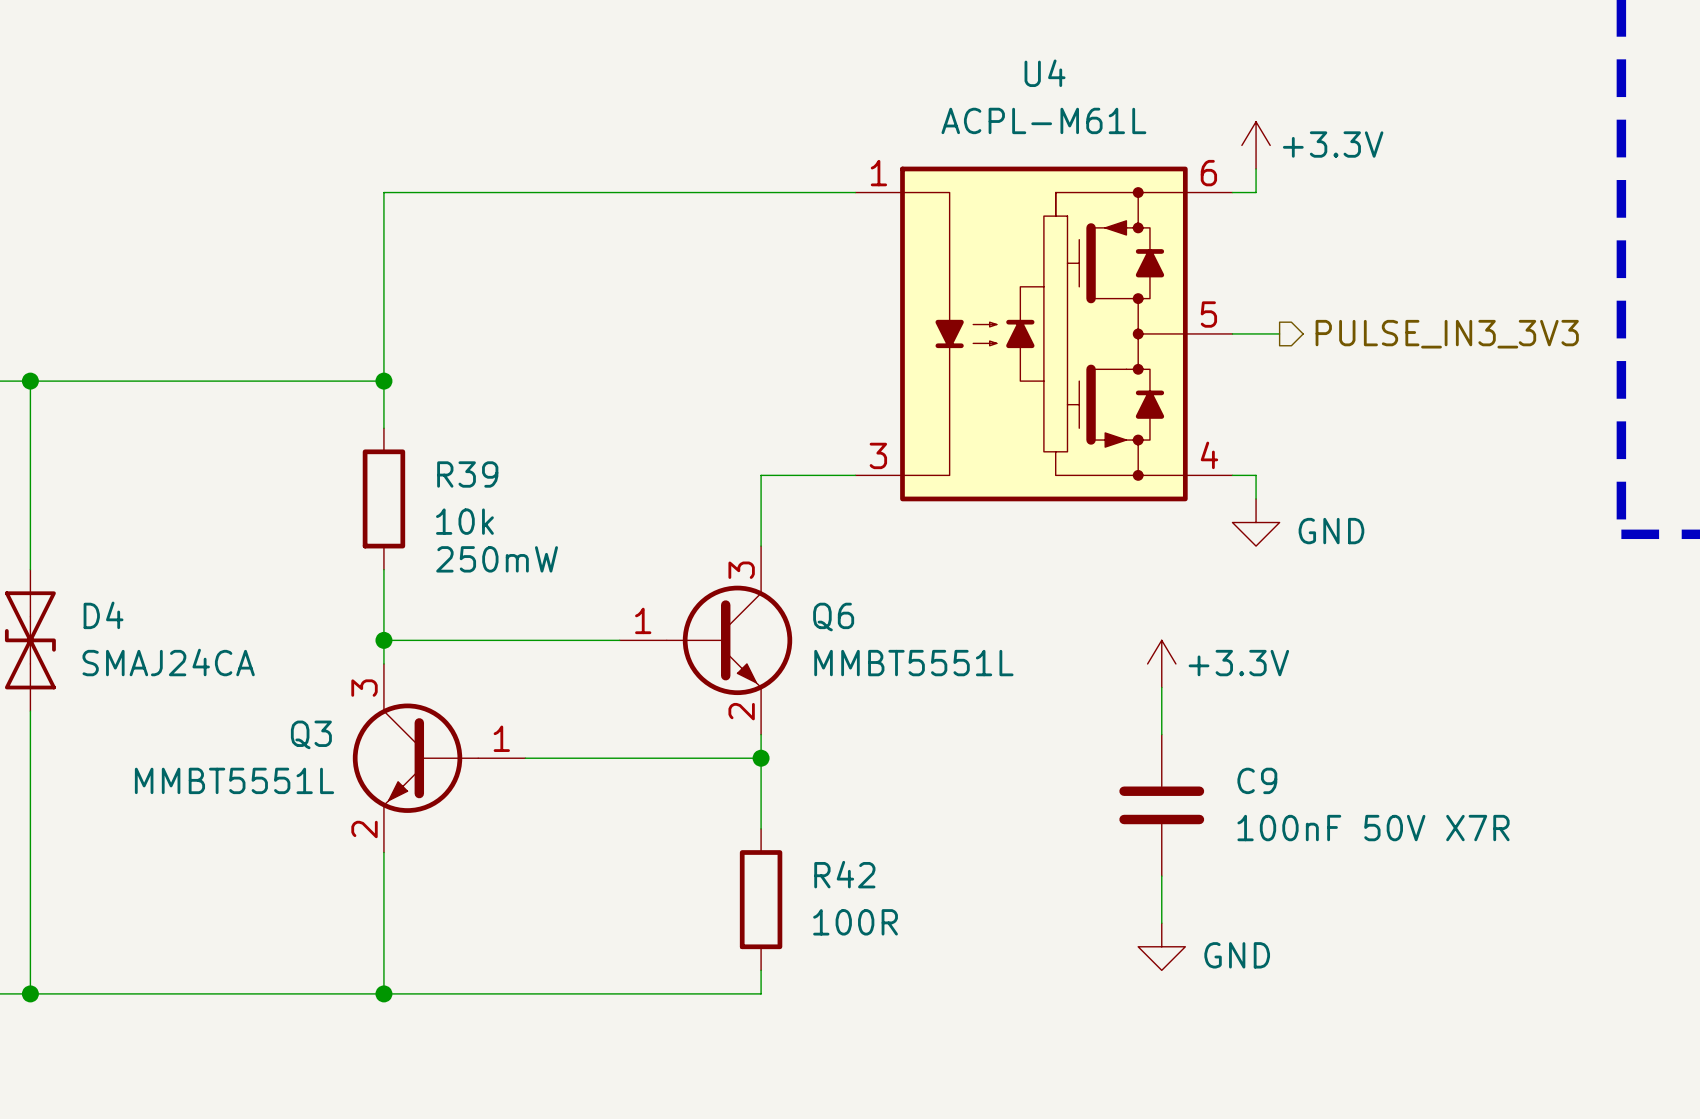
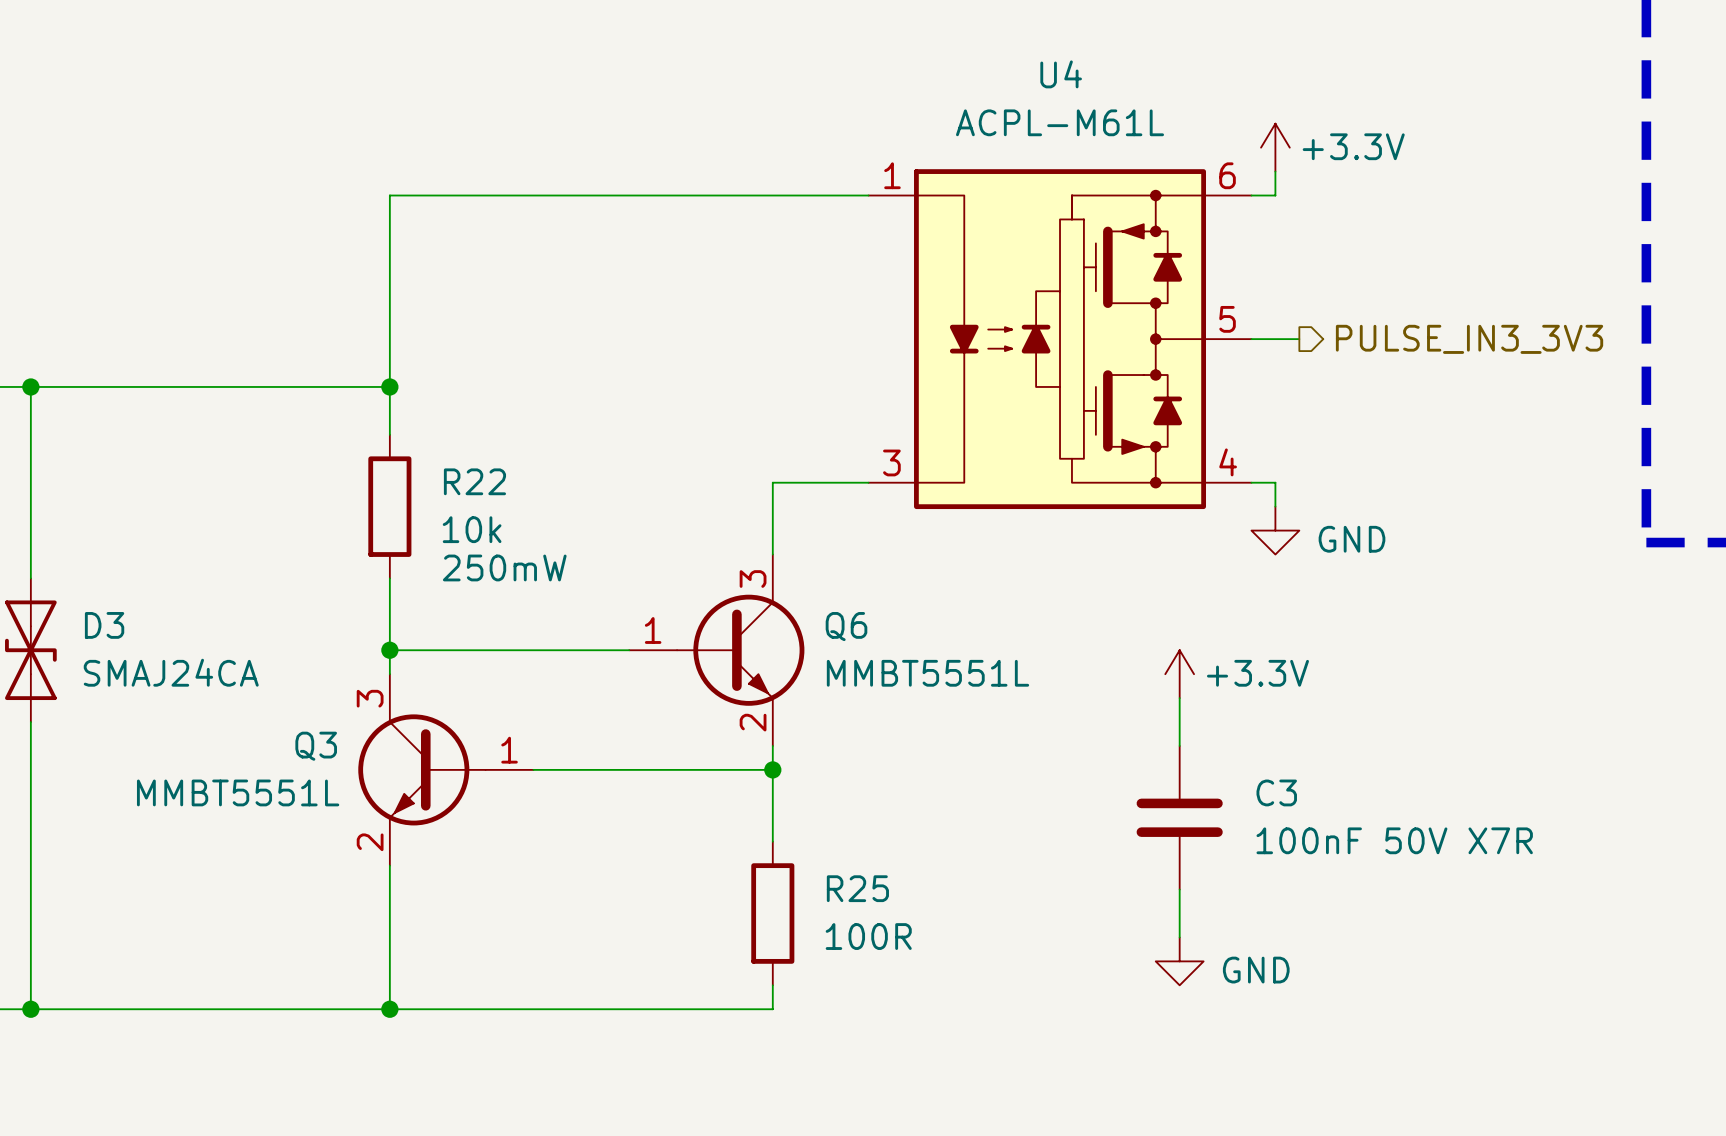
R39 name: R39 (467, 474) -> R22 (474, 481)
D4 name: D4 (103, 615) -> D3 (104, 625)
C9 name: C9 (1257, 780) -> C3 (1276, 792)
R42 name: R42 (844, 874) -> R25 (857, 888)

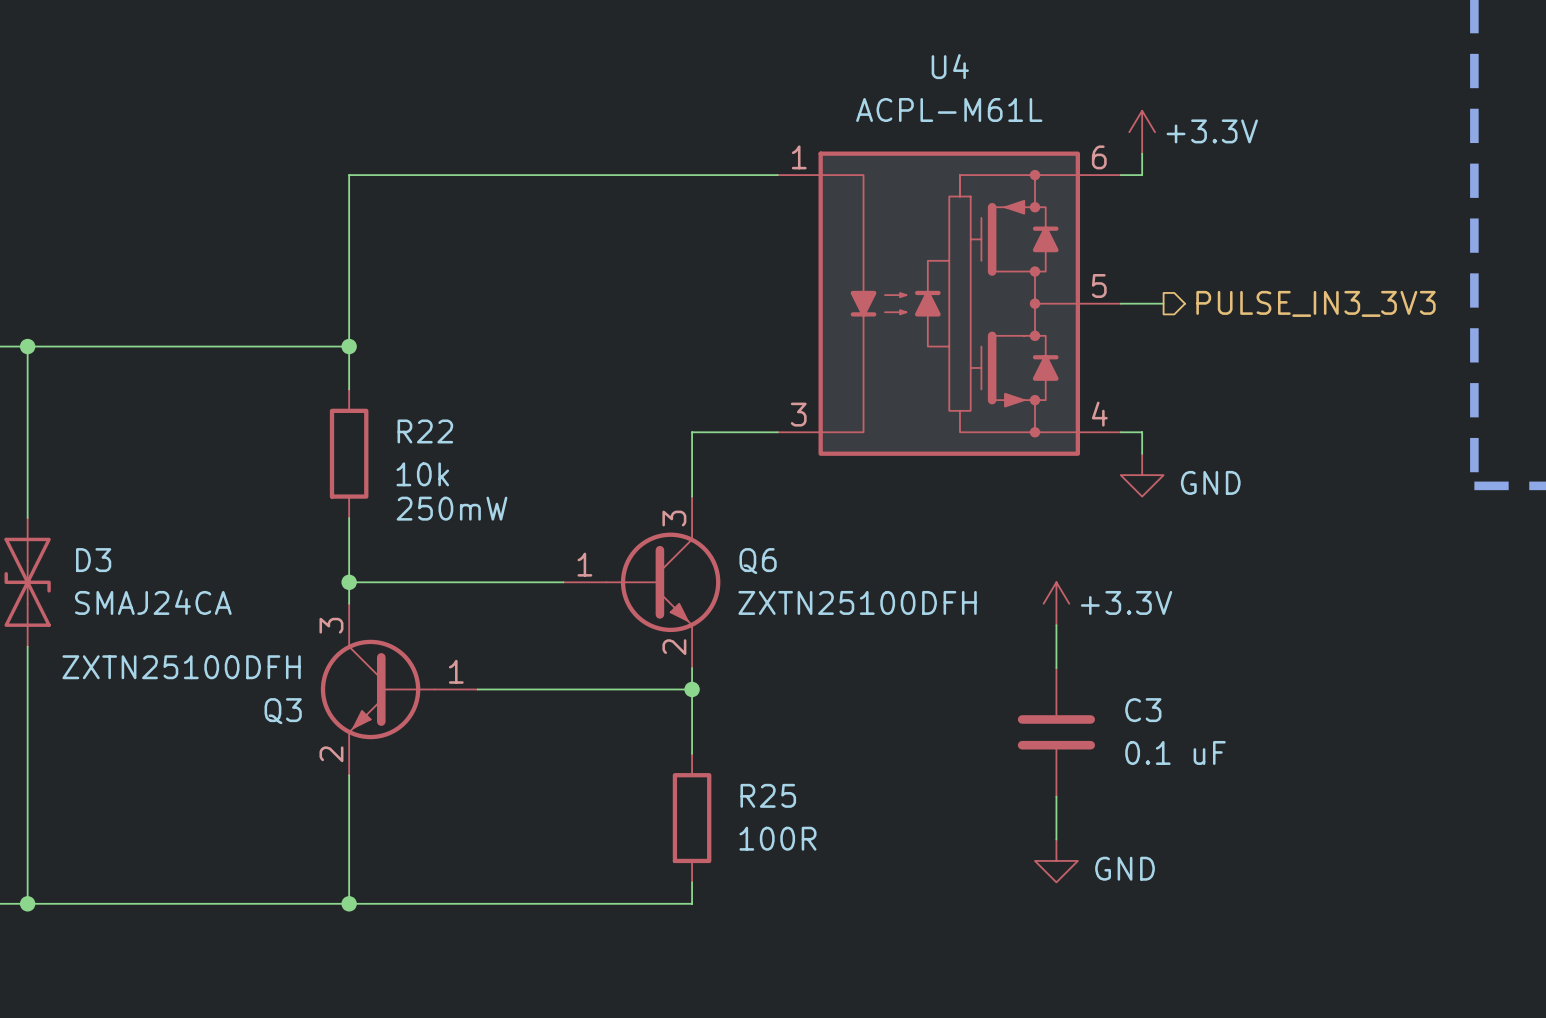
Q6 value: MMBT5551L (927, 673) -> ZXTN25100DFH (857, 602)
Q3 name position: Q3 (316, 746) -> Q3 (283, 711)
Q3 value: MMBT5551L (238, 792) -> ZXTN25100DFH (181, 667)
C3 value: 100nF 50V X7R (1394, 840) -> 0.1 uF (1175, 752)

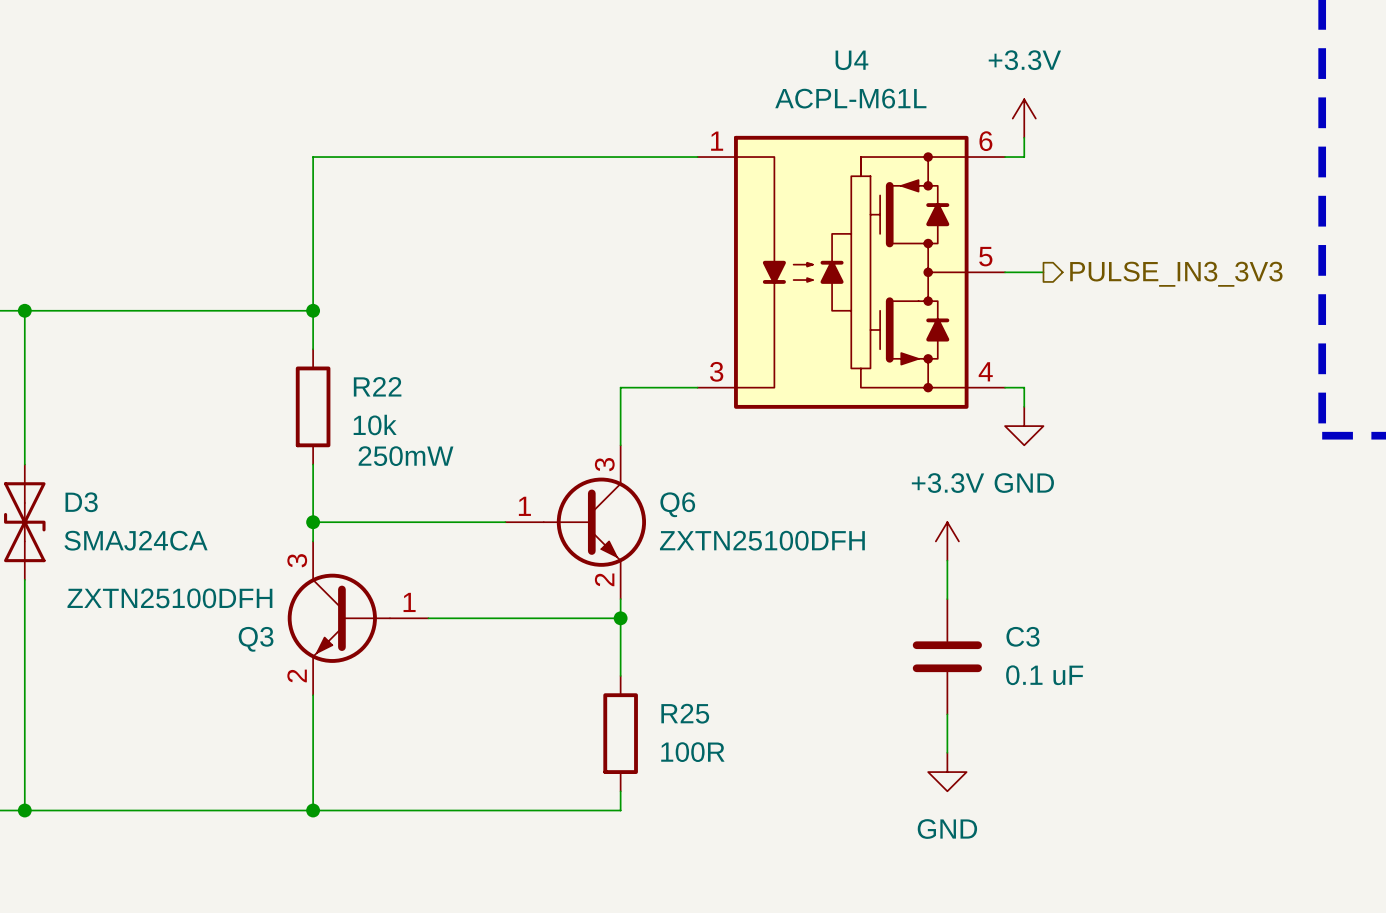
power symbol text position: +3.3V (1212, 131) -> +3.3V (1024, 60)
power symbol text position: GND (1210, 482) -> GND (1024, 483)
power symbol text position: +3.3V (1126, 602) -> +3.3V (948, 483)
power symbol text position: GND (1125, 868) -> GND (947, 829)

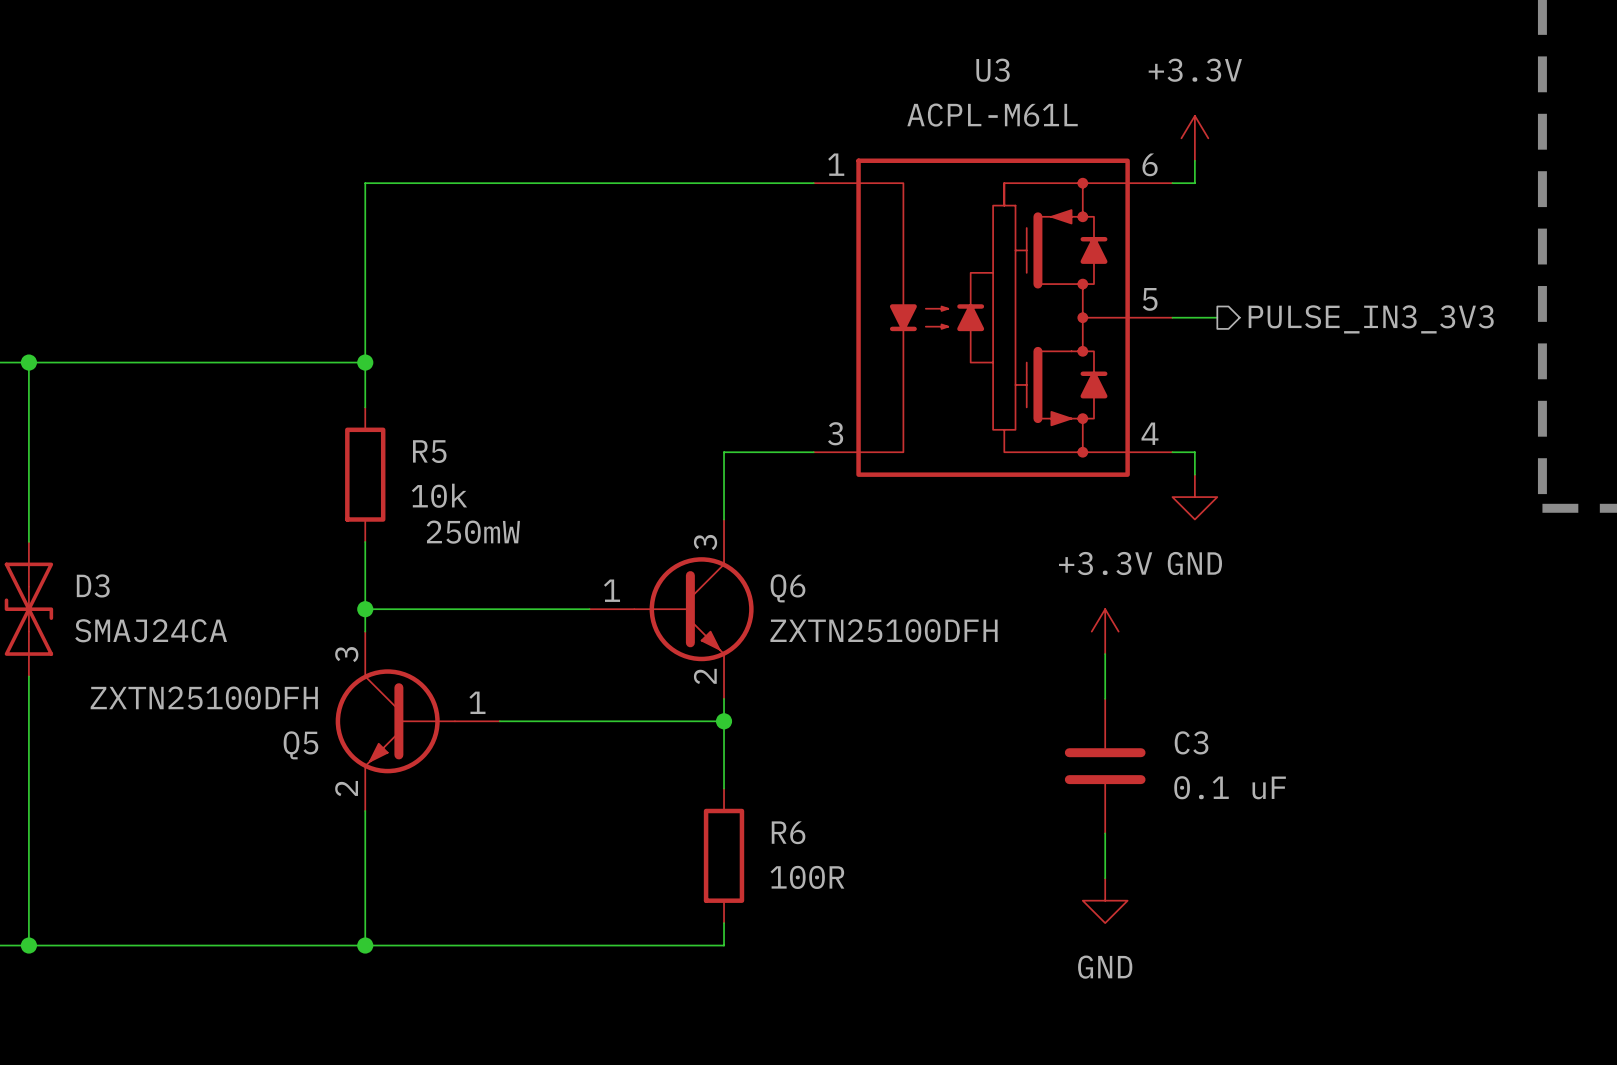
U4 name: U4 (851, 60) -> U3 (993, 70)
R22 name: R22 (377, 386) -> R5 (429, 451)
Q3 name: Q3 (256, 639) -> Q5 (300, 745)
R25 name: R25 (685, 713) -> R6 (788, 832)

